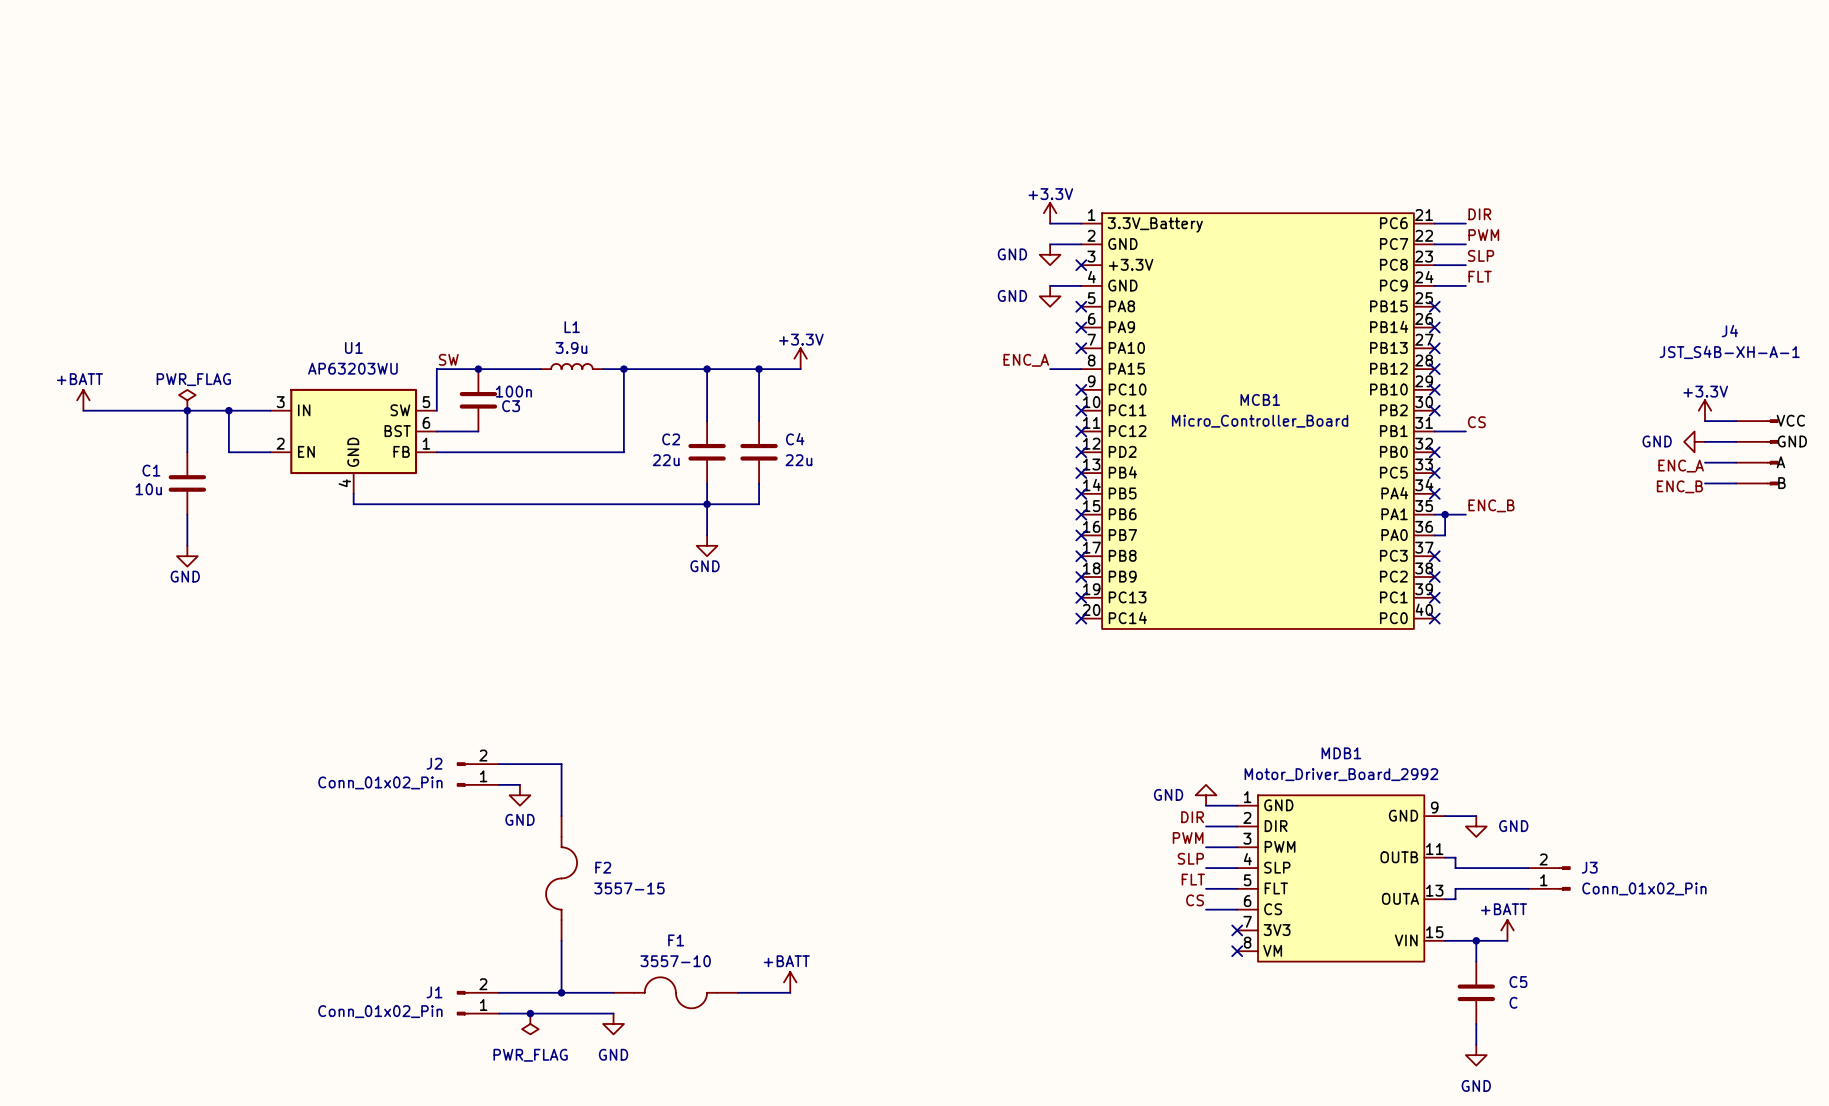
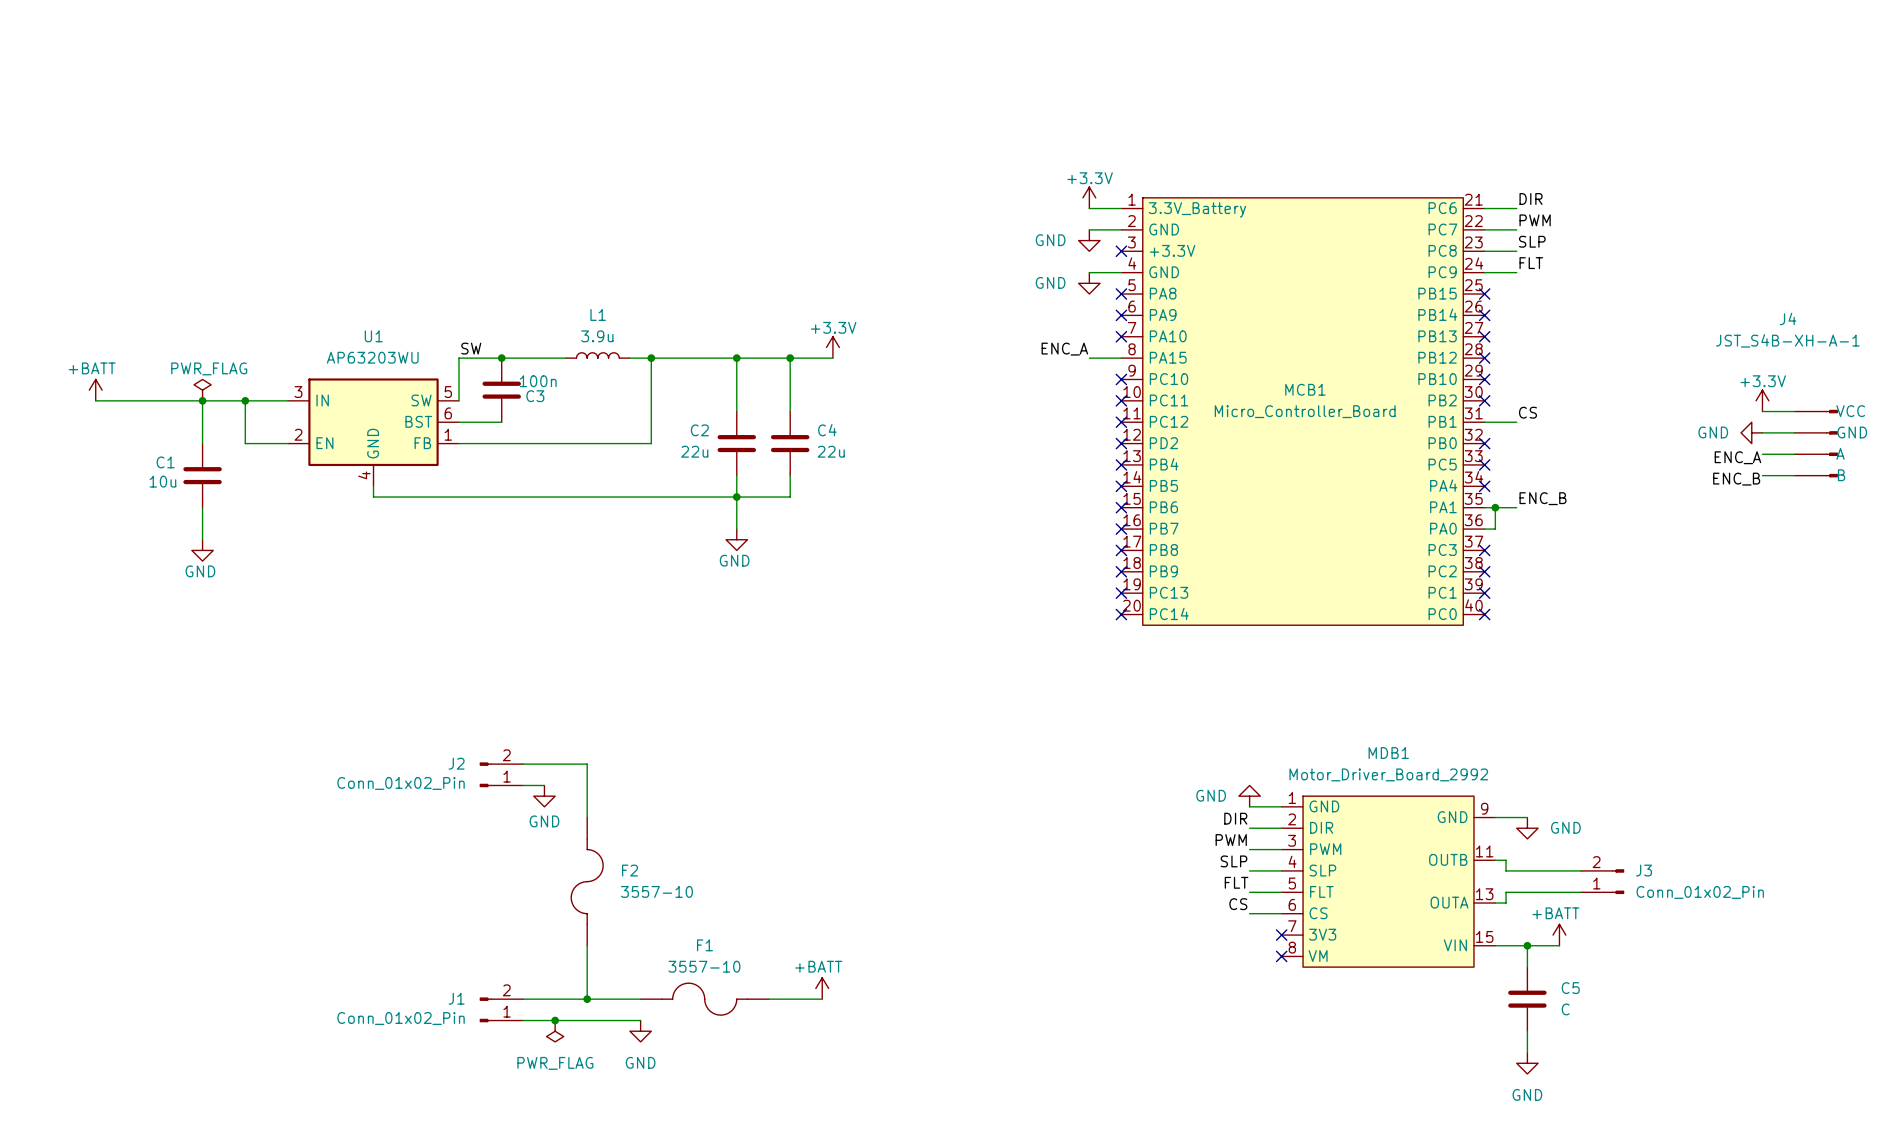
F2 value: 3557-15 (629, 888) -> 3557-10 (656, 891)

